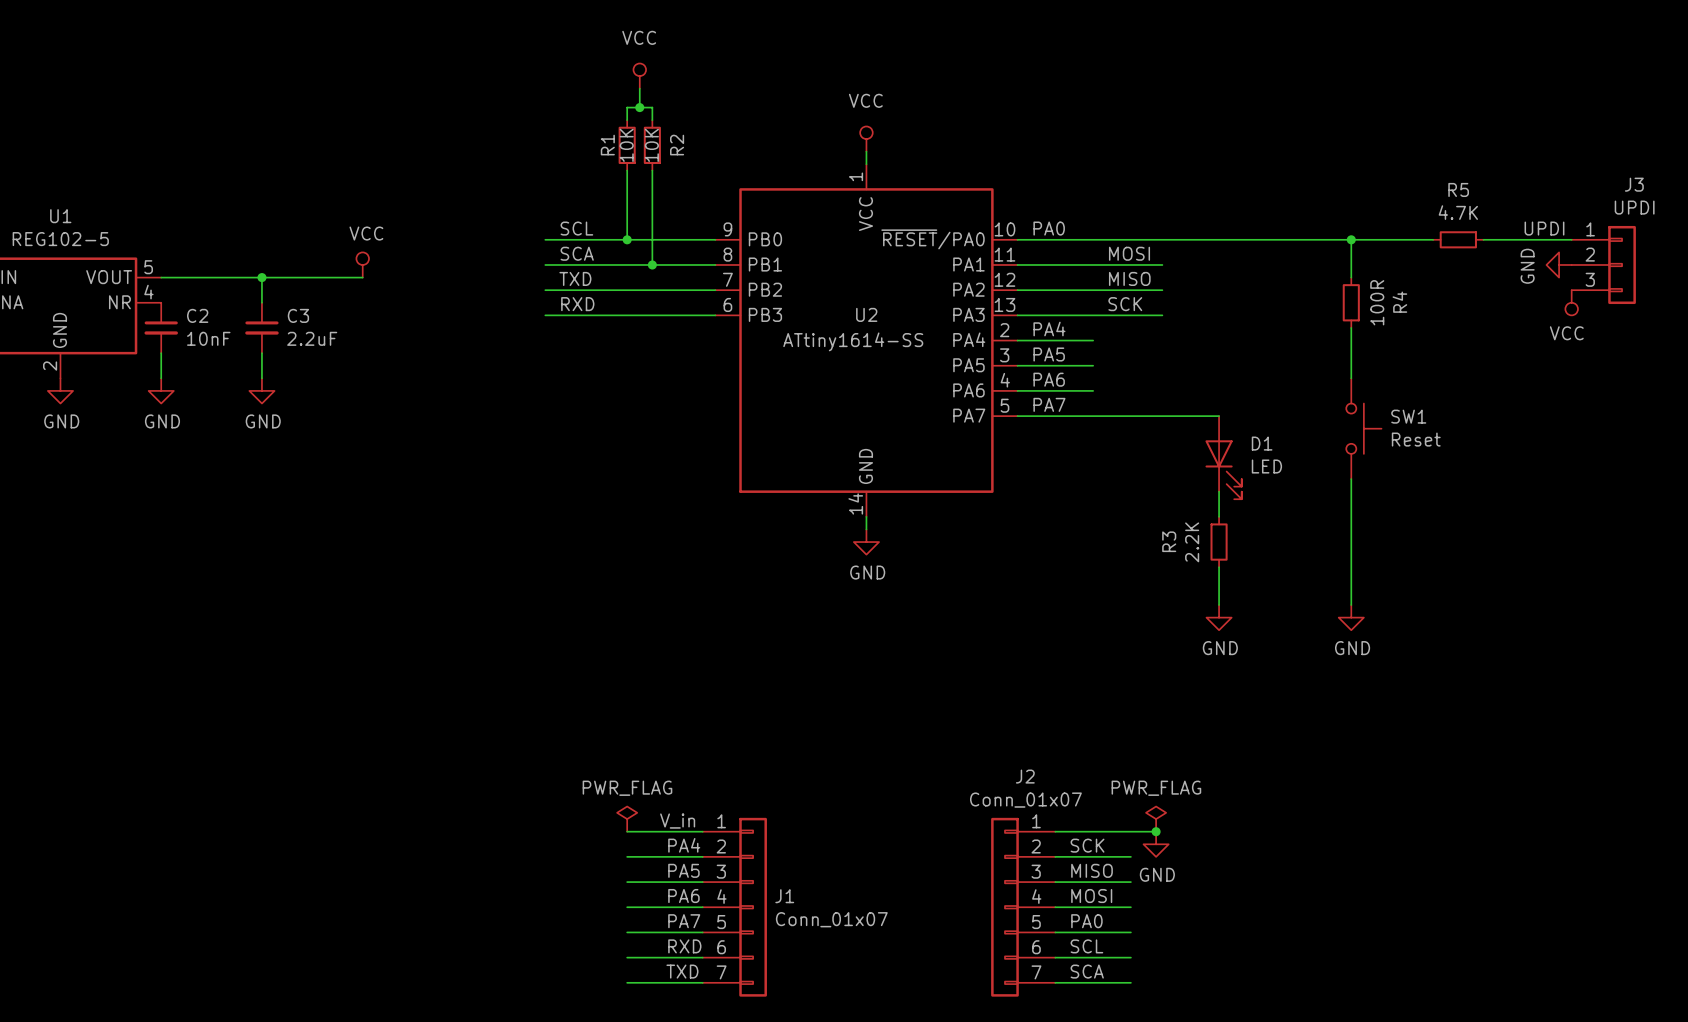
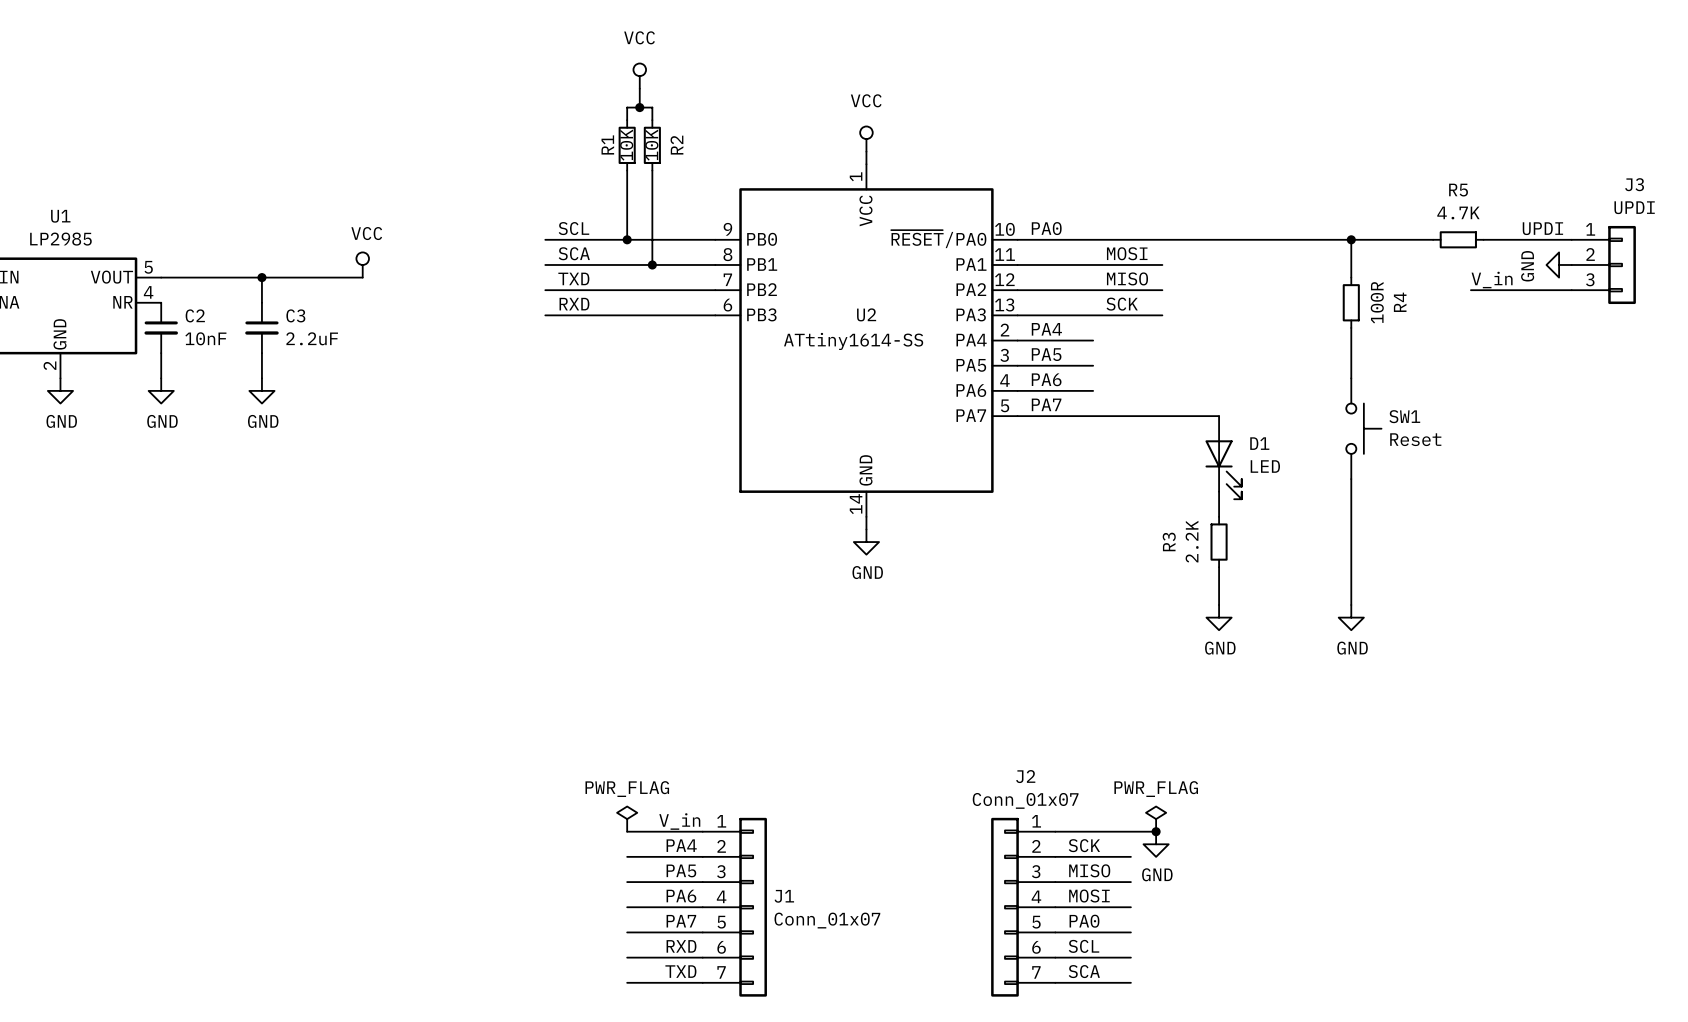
U1 value: REG102-5 (60, 239) -> LP2985 (60, 239)
label: none -> V_in (1492, 280)
wire: none -> (1470, 290) (1571, 290)
power symbol: VCC (1571, 302) -> none

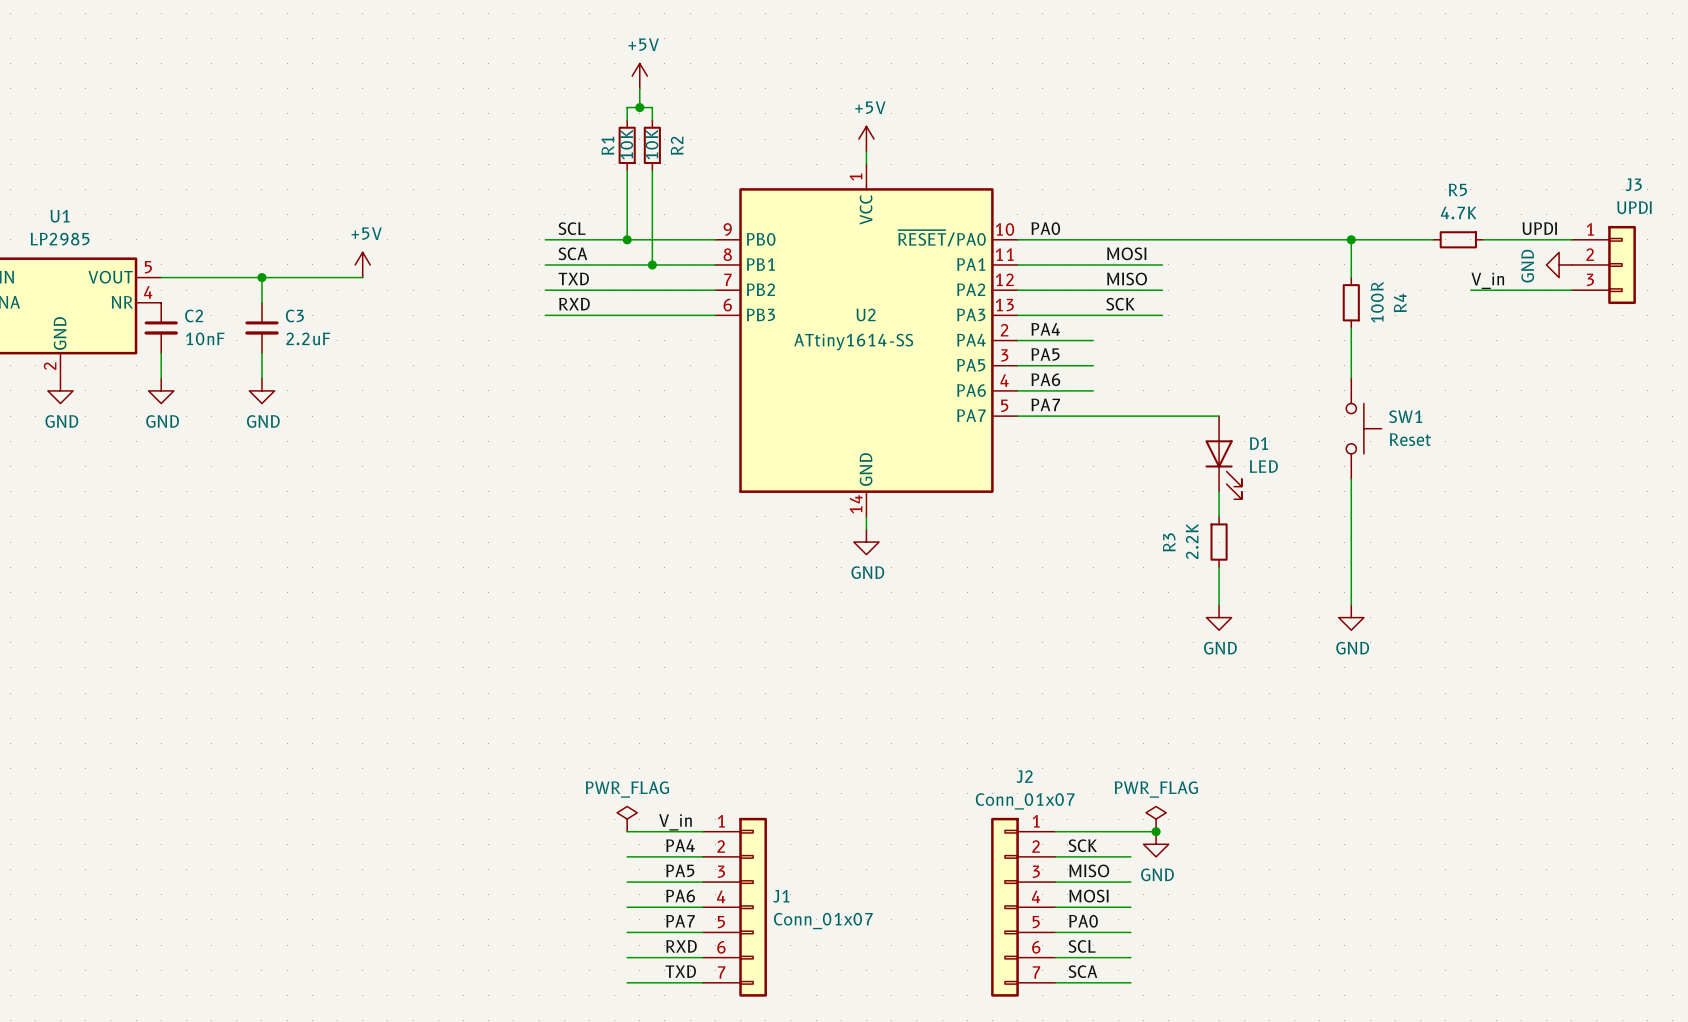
power symbol: VCC (639, 76) -> +5V (639, 76)
power symbol: VCC (866, 139) -> +5V (866, 139)
power symbol: VCC (362, 264) -> +5V (362, 264)

